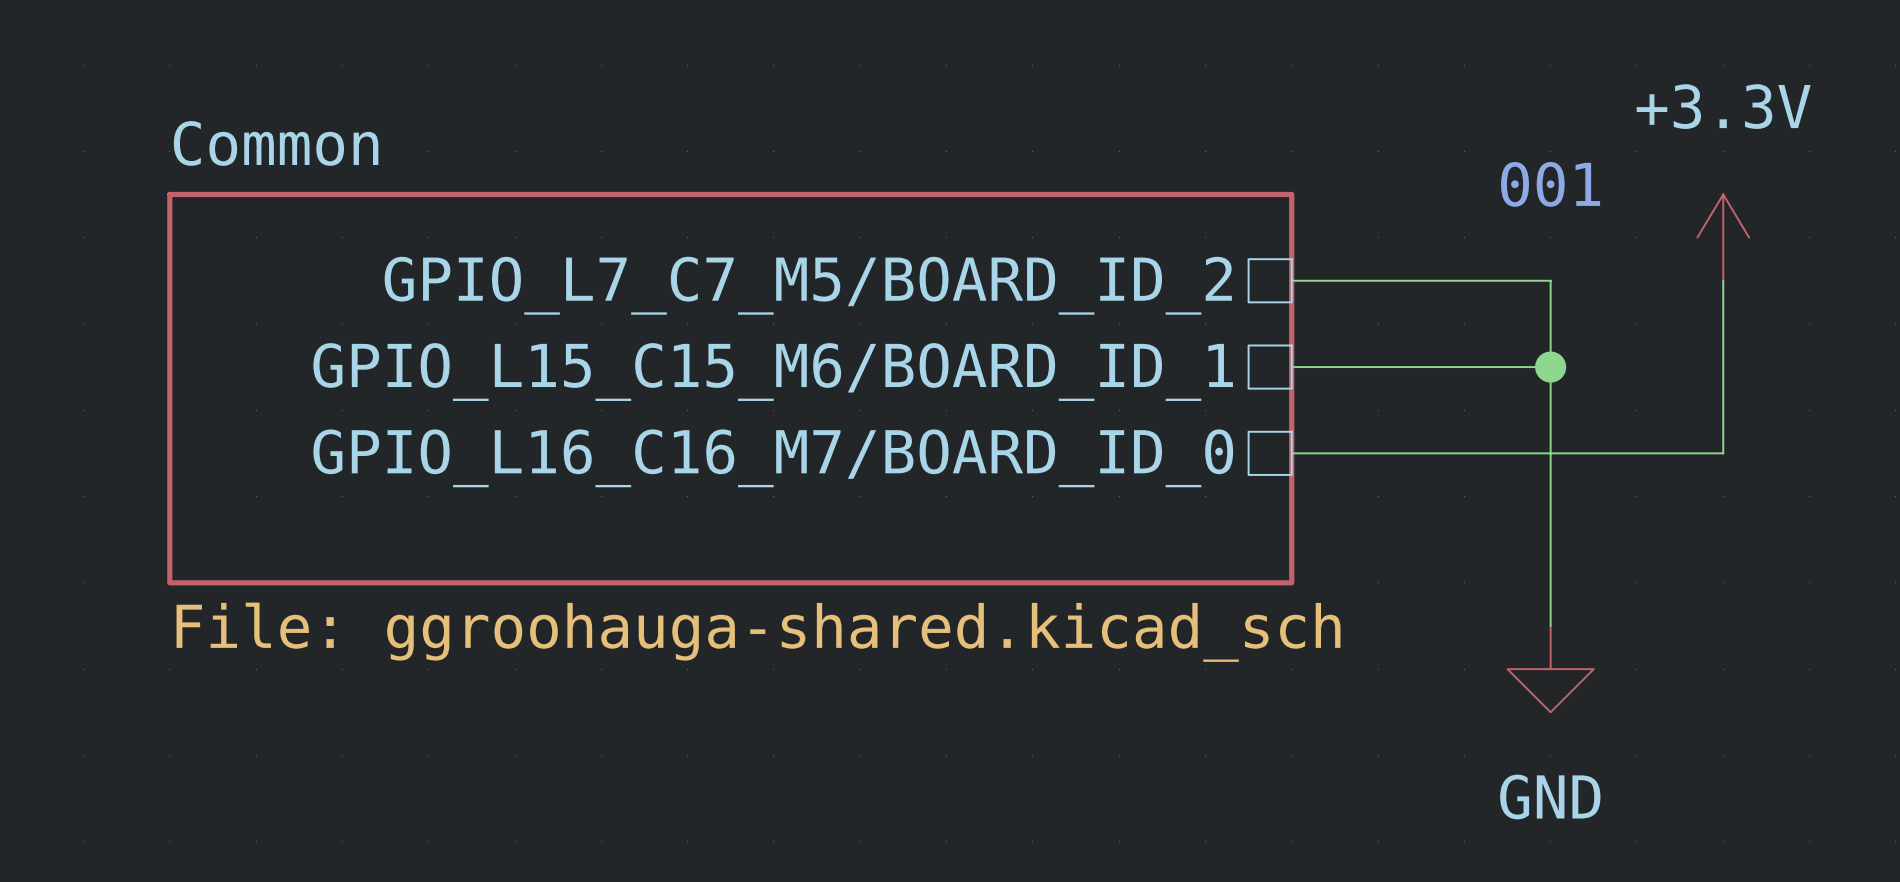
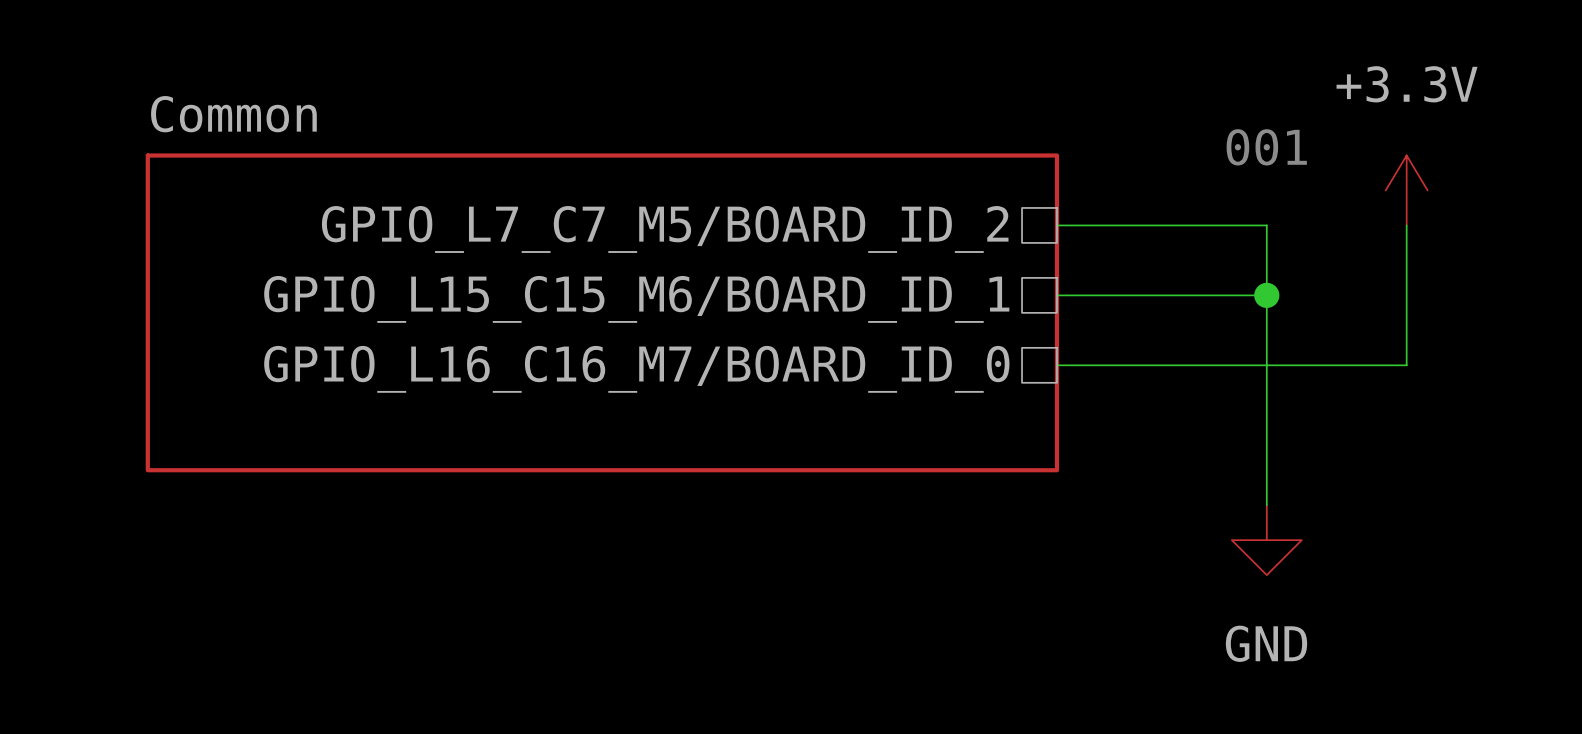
sheet Common value: File: ggroohauga-shared.kicad_sch (758, 632) -> none

